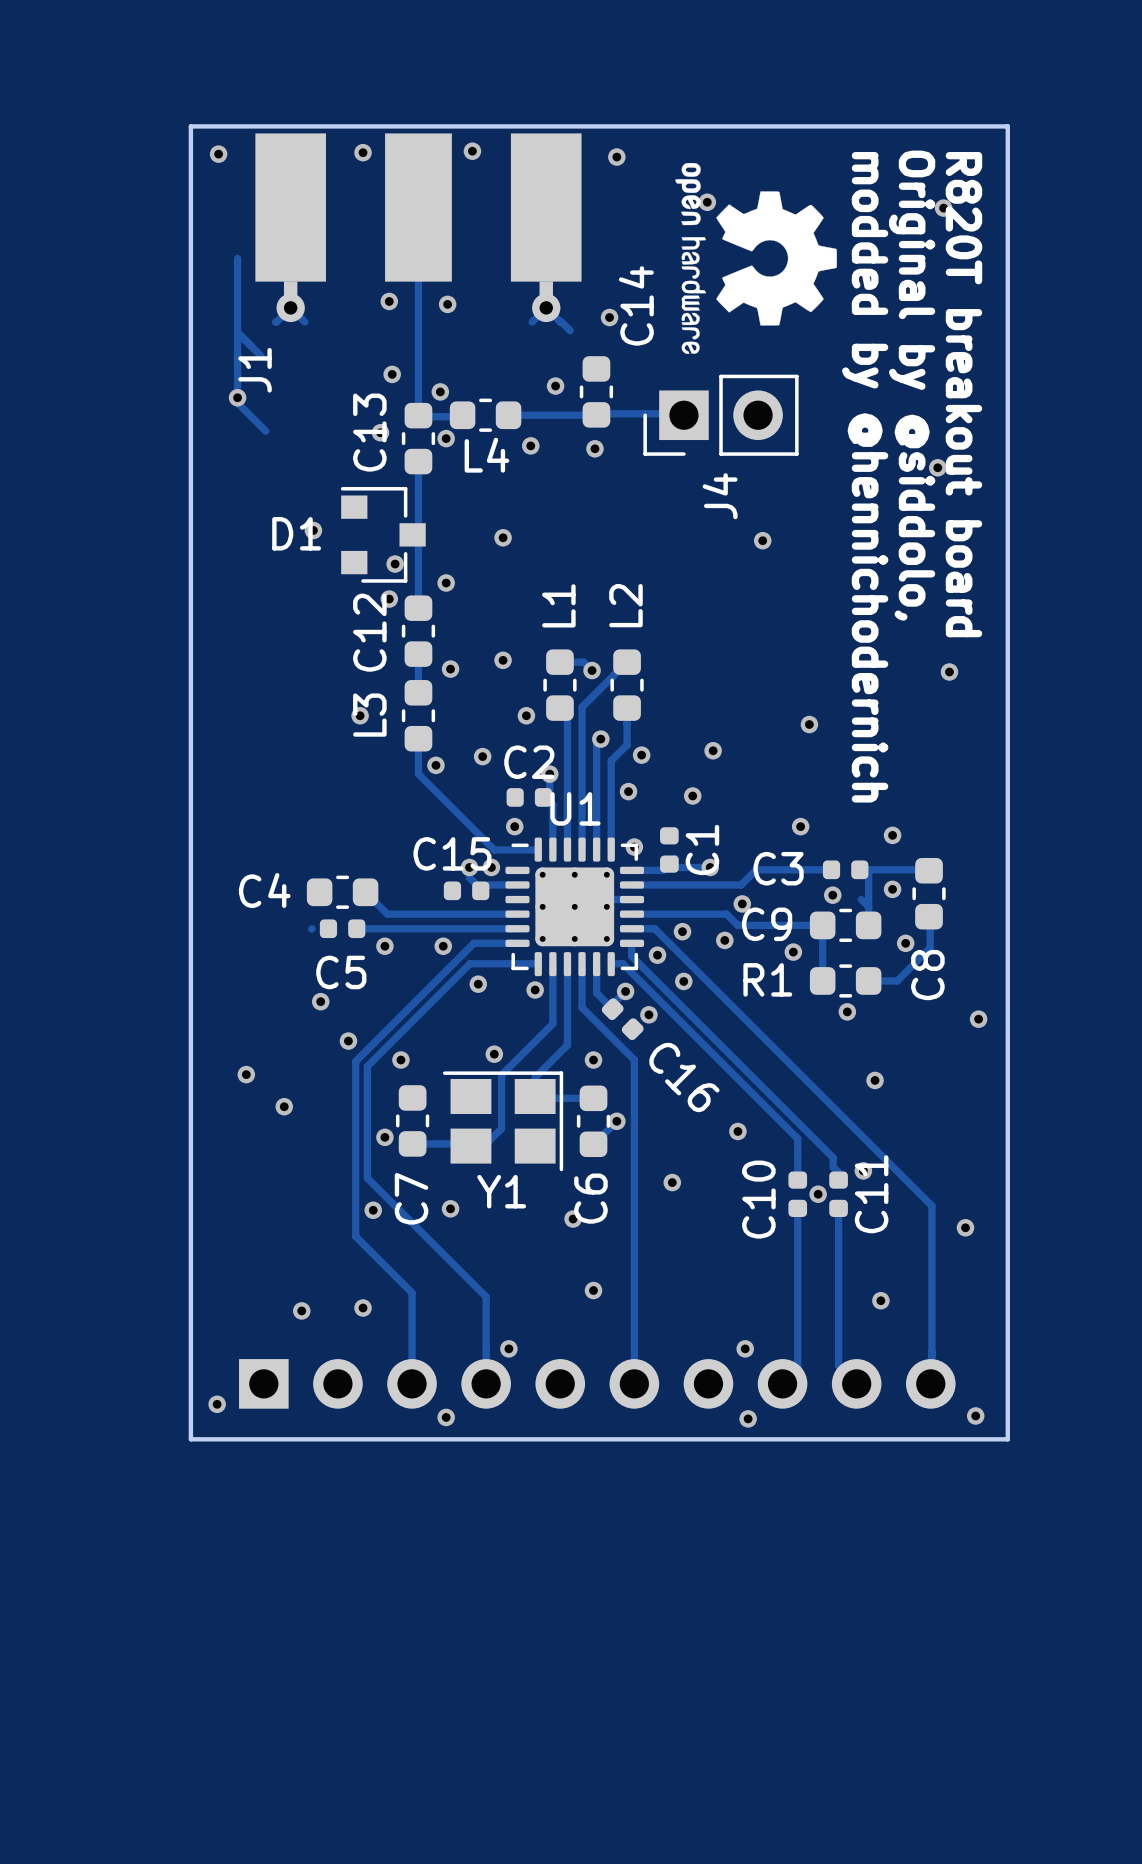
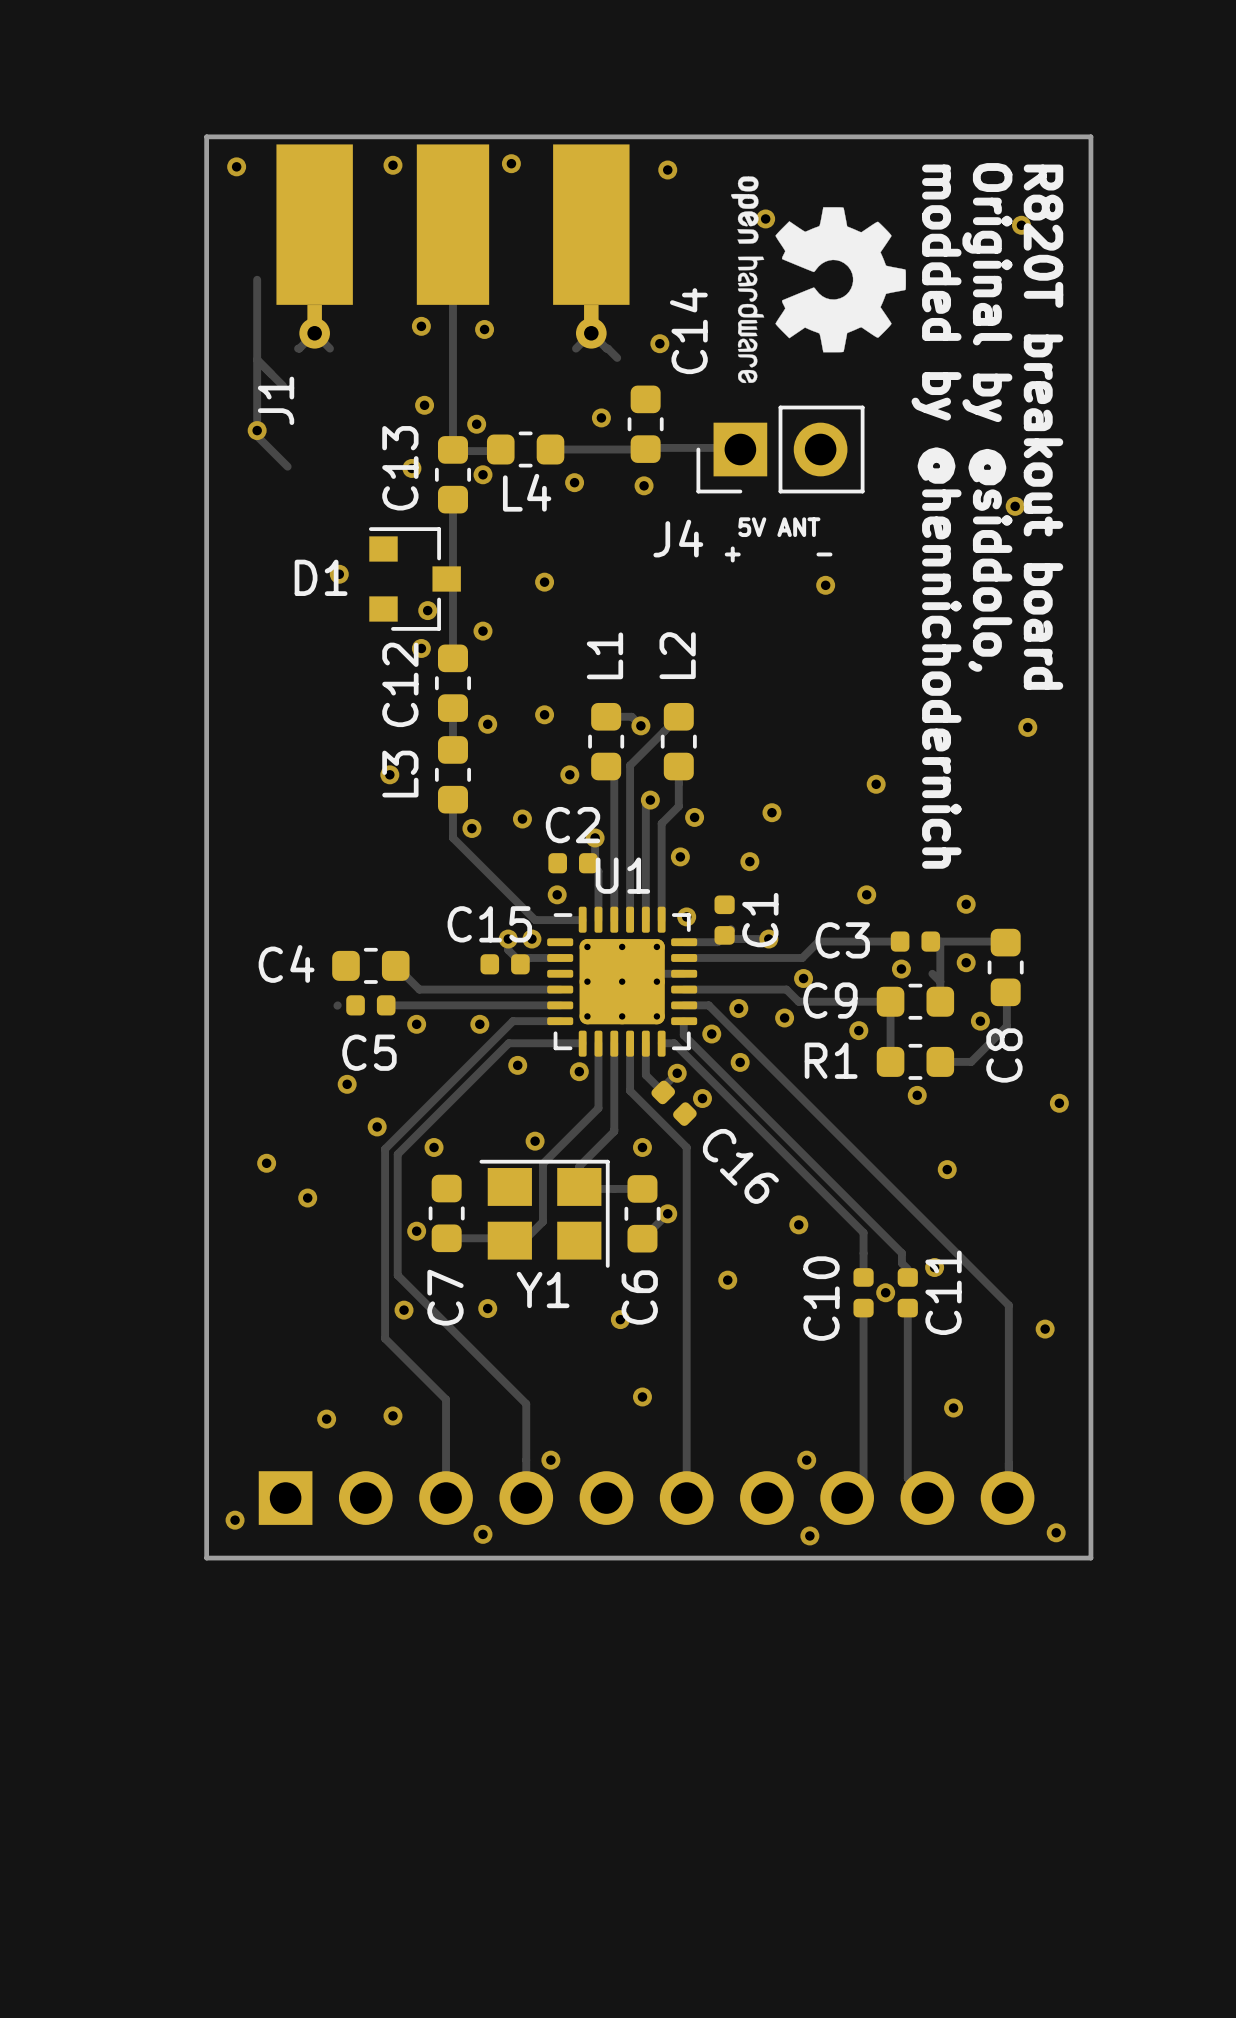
text: none -> 5V ANT (779, 527)
J4 name rotation: 0° (720, 496) -> 90° clockwise (678, 538)
J4 name position: J4 (720, 496) -> J4 (678, 538)
text: none -> + - (778, 554)

